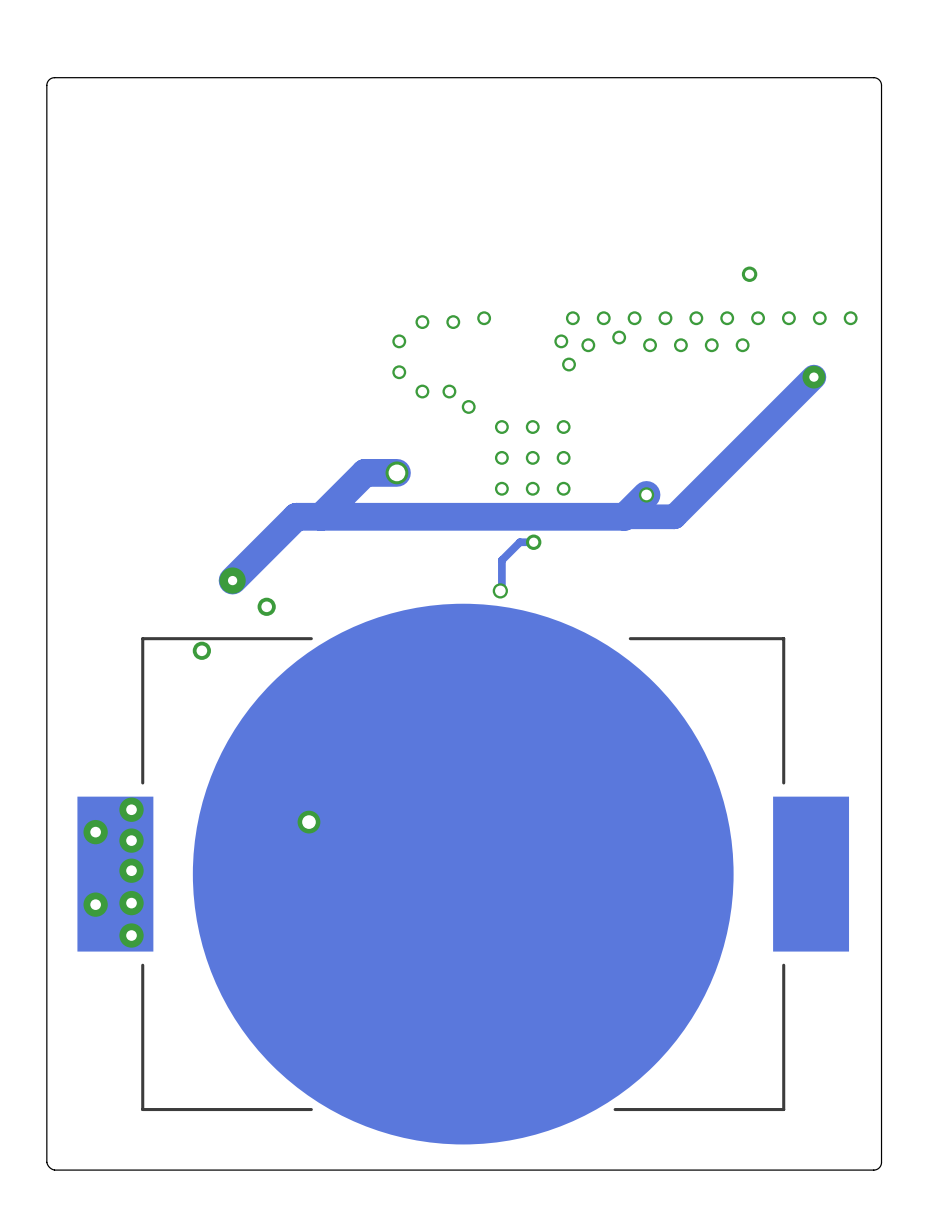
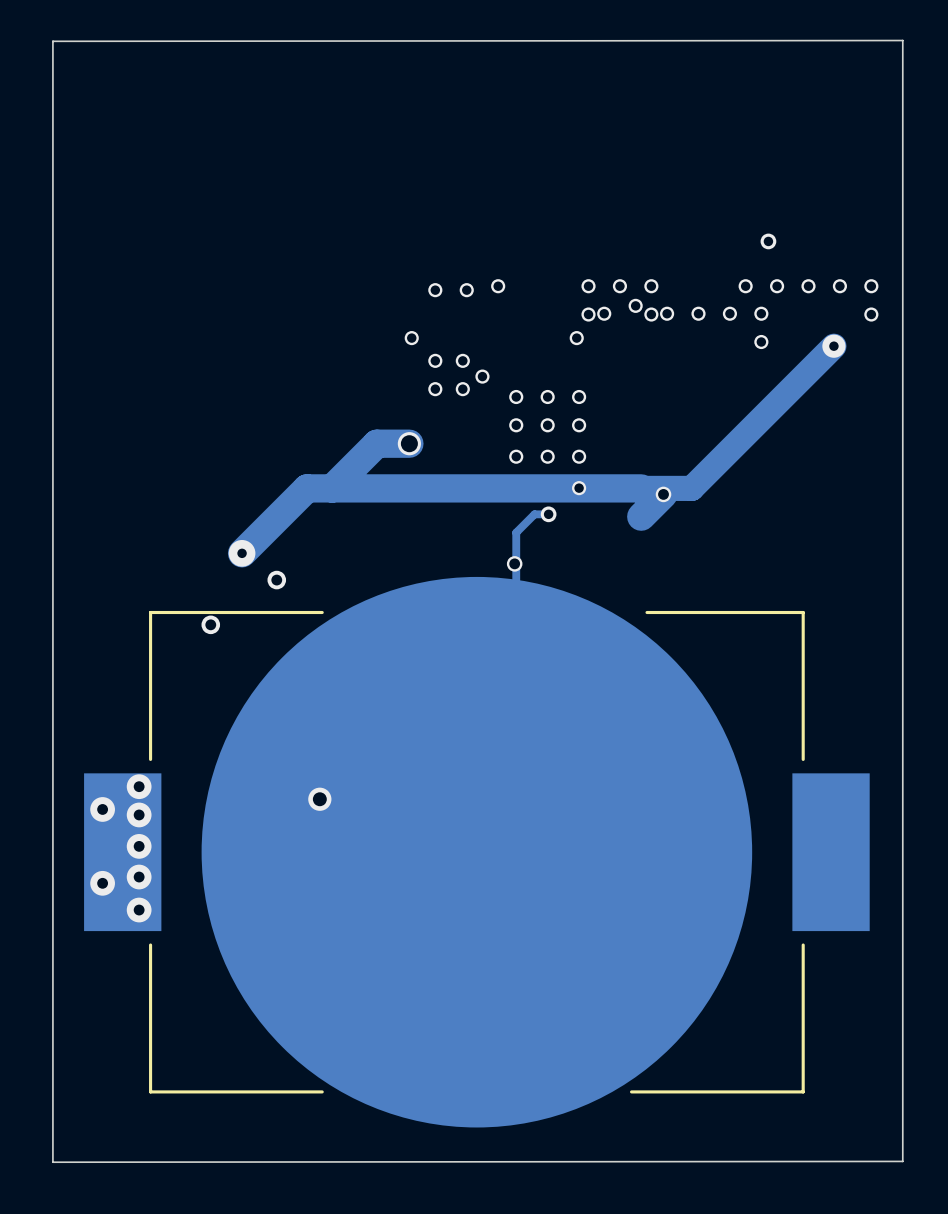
board edge: (881, 85) (879, 79) (873, 77) (54, 77) (49, 79) (46, 85) -> (902, 77) (902, 40) (52, 41) (52, 77)
via position: (749, 274) -> (768, 241)
via: none -> (498, 286)
via: none -> (588, 286)
via: none -> (619, 286)
via: none -> (651, 286)
via: none -> (745, 286)
via: none -> (777, 286)
via: none -> (808, 286)
via: none -> (839, 286)
via: none -> (871, 286)
via: none -> (435, 290)
via: none -> (466, 290)
via: none -> (635, 305)
via: none -> (604, 313)
via: none -> (667, 313)
via: none -> (698, 313)
via: none -> (729, 313)
via: none -> (761, 313)
via: (484, 318) -> none
via: (603, 318) -> none
via: (665, 318) -> none
via: (696, 318) -> none
via: (727, 318) -> none
via: (758, 318) -> none
via: (788, 318) -> none
via: (819, 318) -> none
via: (422, 322) -> none
via: (453, 322) -> none
via: (619, 337) -> none
via: (588, 345) -> none
via: (650, 345) -> none
via: (680, 345) -> none
via: (711, 345) -> none
via: none -> (435, 360)
via: none -> (462, 360)
via: (569, 364) -> none
via: (399, 372) -> none
track: (813, 377) (674, 516) (296, 516) (232, 580) -> (833, 346) (691, 488) (307, 488) (242, 553)
via position: (813, 377) -> (833, 346)
via: none -> (482, 376)
via: none -> (516, 397)
via: none -> (547, 397)
via: none -> (579, 397)
via: (468, 406) -> none
track: (396, 472) (364, 472) (321, 516) -> (409, 443) (376, 443) (332, 488)
via position: (396, 472) -> (409, 443)
via: (501, 488) -> none
via: (532, 488) -> none
track: (533, 542) (519, 542) (501, 560) -> (548, 514) (534, 514) (516, 532) (516, 560)
via position: (533, 542) -> (548, 514)
via position: (232, 580) -> (242, 553)
via position: (500, 590) -> (514, 563)
via position: (266, 606) -> (276, 580)
via position: (201, 650) -> (210, 624)
via: none -> (139, 786)
via: none -> (102, 809)
via position: (308, 822) -> (319, 799)
via: (95, 832) -> none
part position: (463, 874) -> (476, 852)
via: none -> (102, 883)
via: (95, 904) -> none
via: (131, 935) -> none
board edge: (881, 1150) (881, 1164) (873, 1170) (54, 1170) (47, 1164) (46, 1150) -> (902, 1161) (52, 1162)

